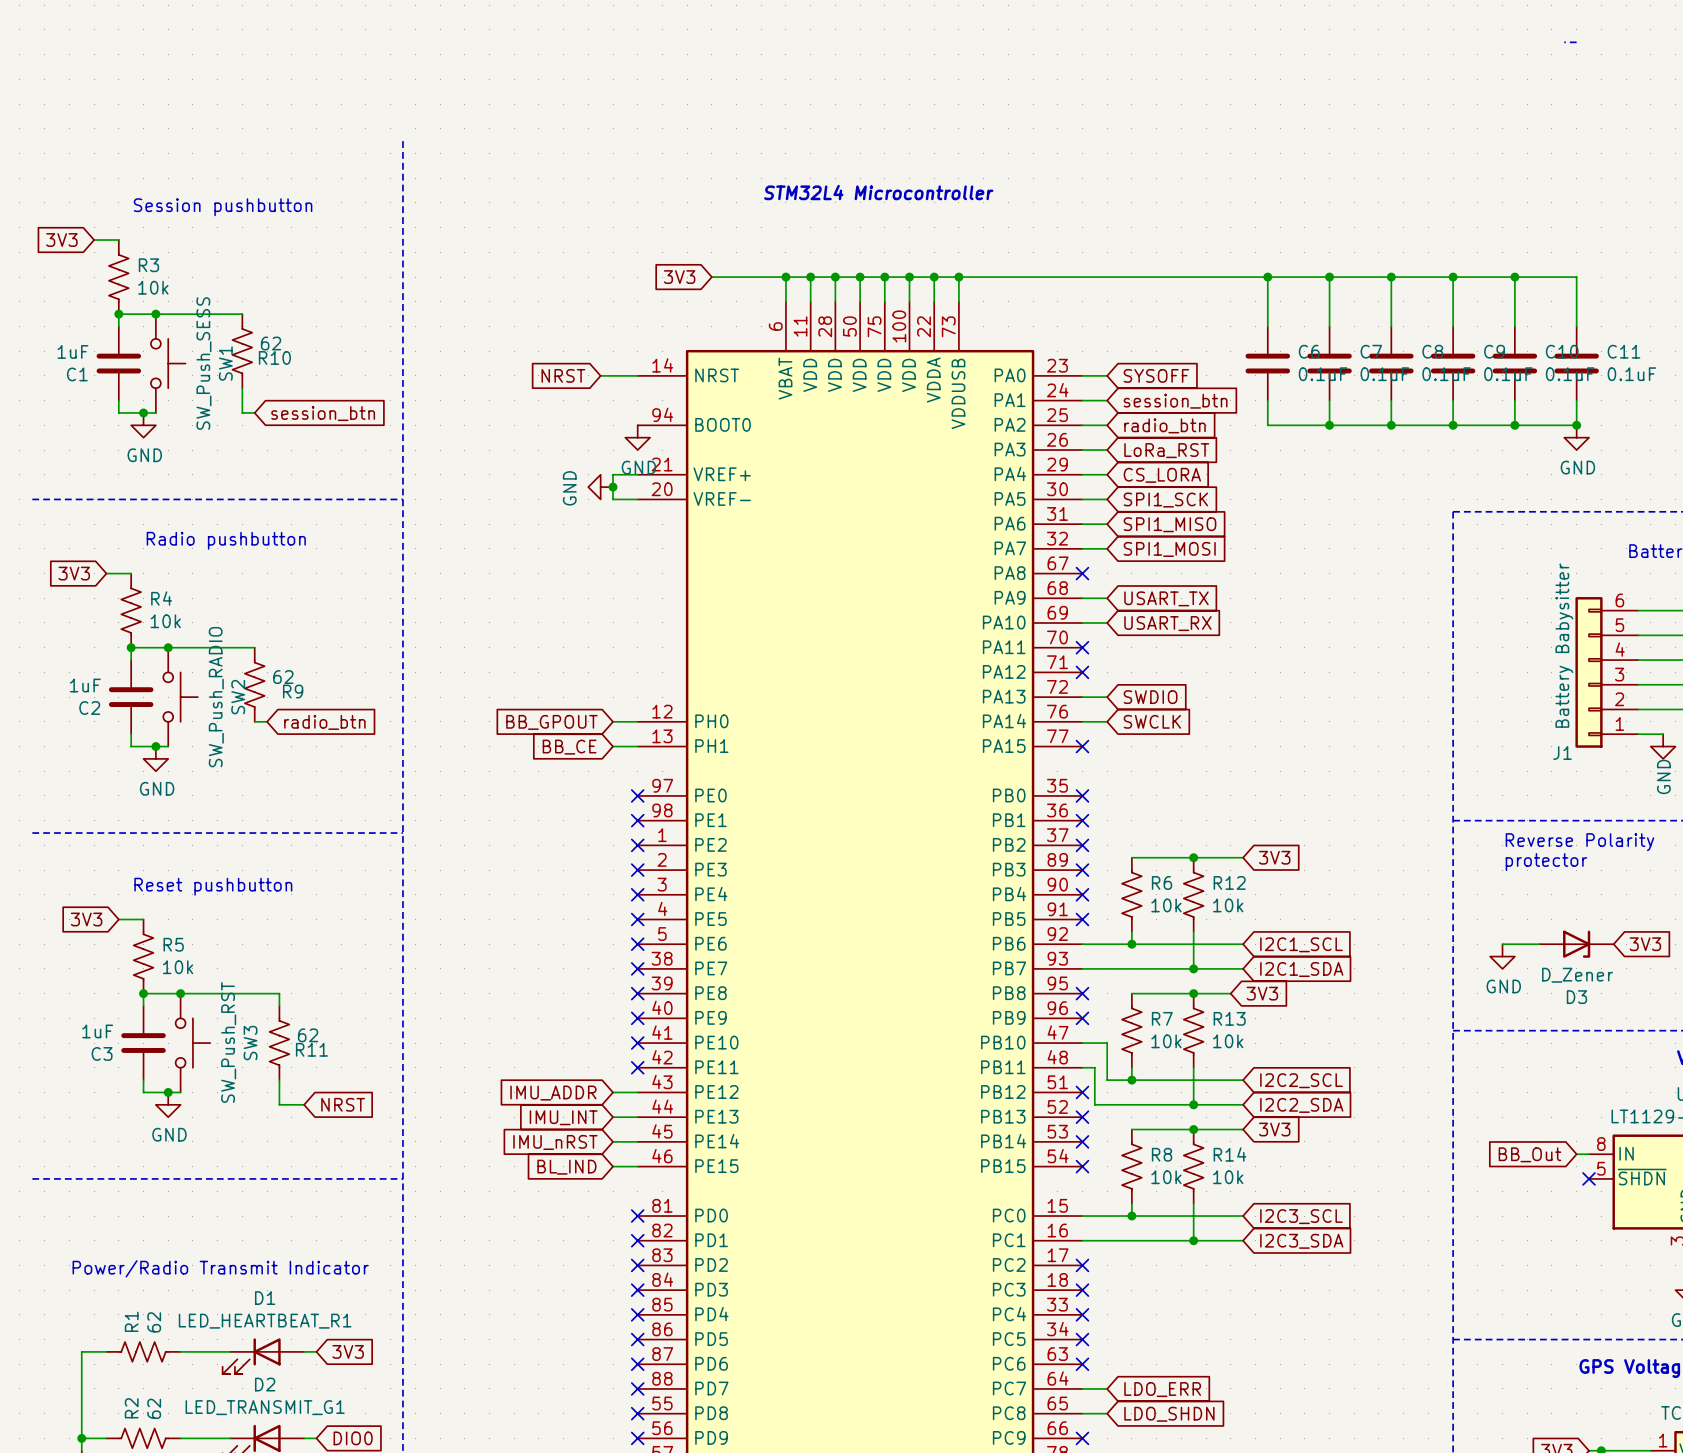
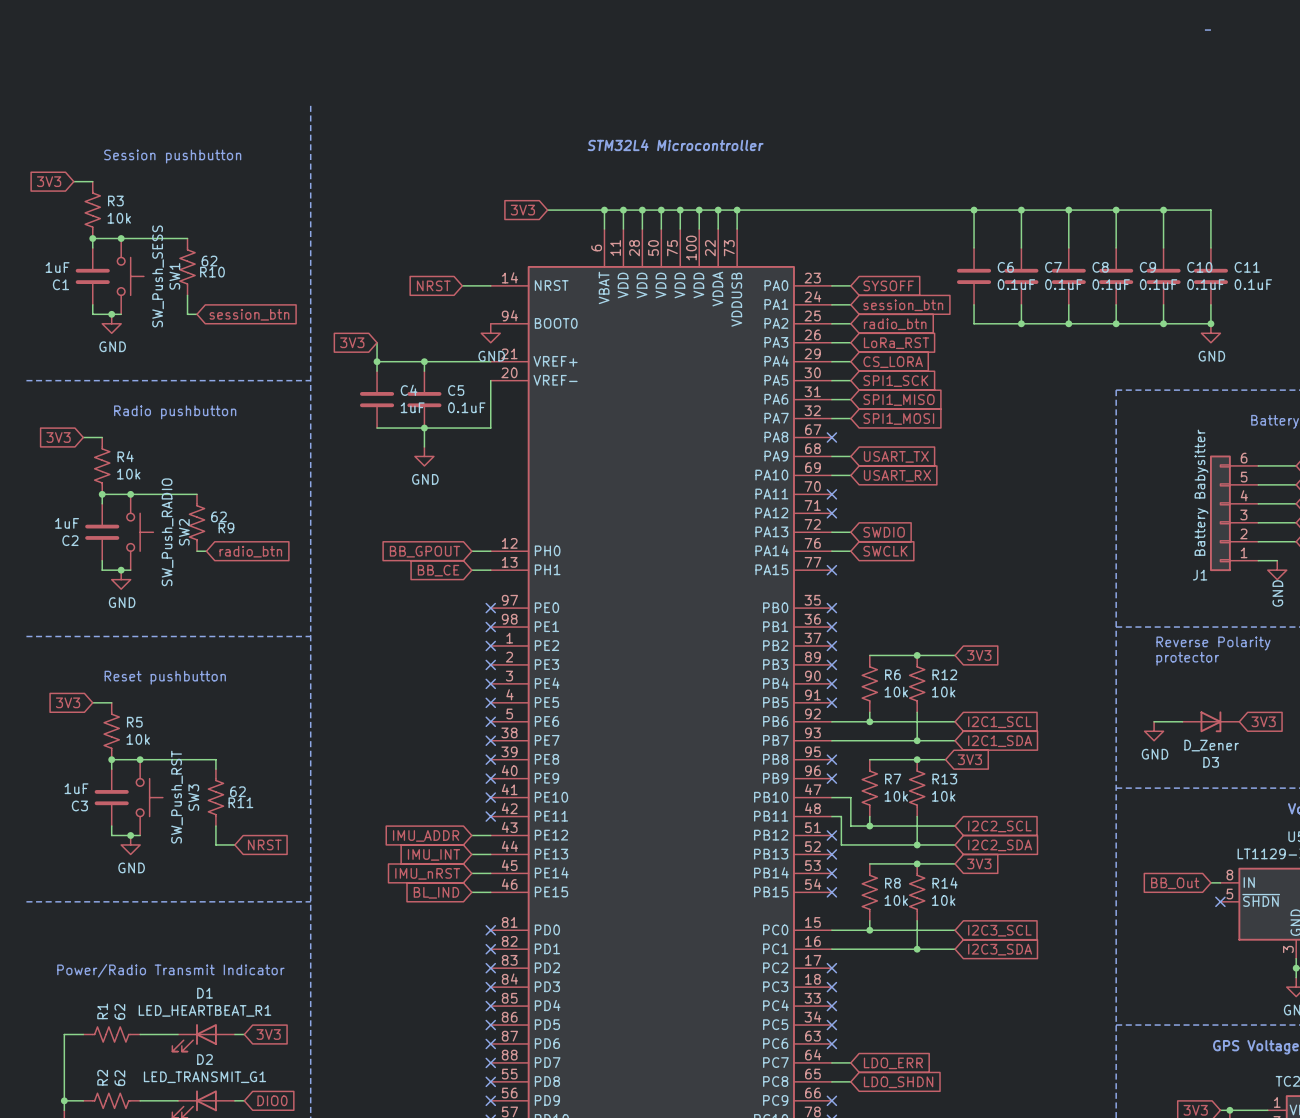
global label: none -> 3V3 (352, 342)
wire: none -> (377, 342) (377, 371)
junction: none -> (377, 361)
wire: none -> (424, 361) (424, 371)
junction: none -> (424, 361)
wire: (613, 474) (613, 499) (637, 499) -> (471, 361) (377, 361)
power symbol rotation: 0° (600, 487) -> 90° counterclockwise (424, 456)
power symbol position: GND (600, 487) -> GND (424, 456)
junction: (613, 487) -> none
wire: none -> (490, 380) (490, 428) (377, 428)
C4: none -> 1uF (377, 399)
C5: none -> 0.1uF (424, 399)
wire: none -> (424, 428) (424, 446)
junction: none -> (424, 428)

